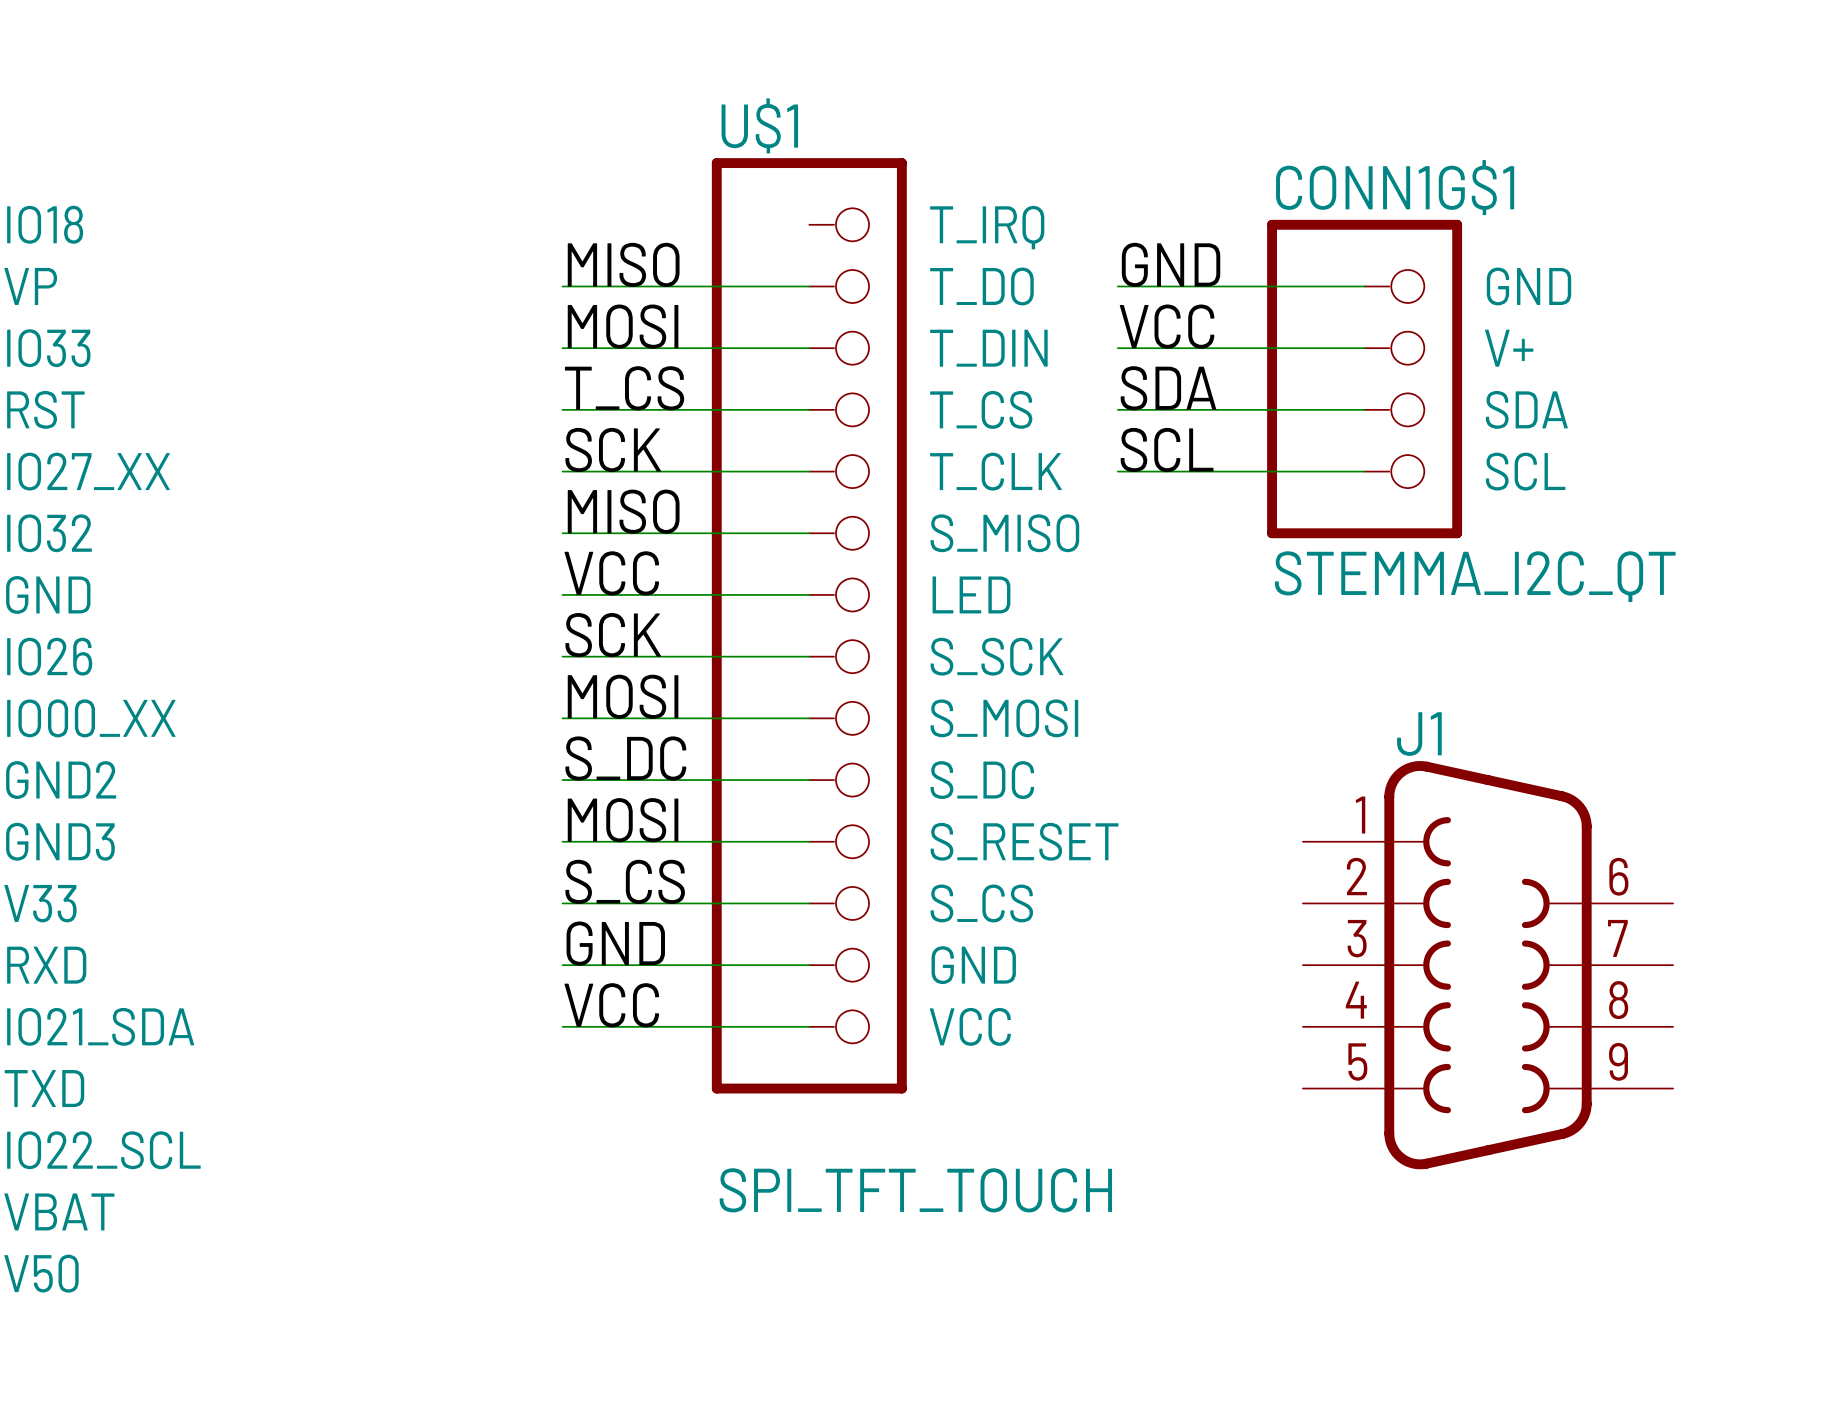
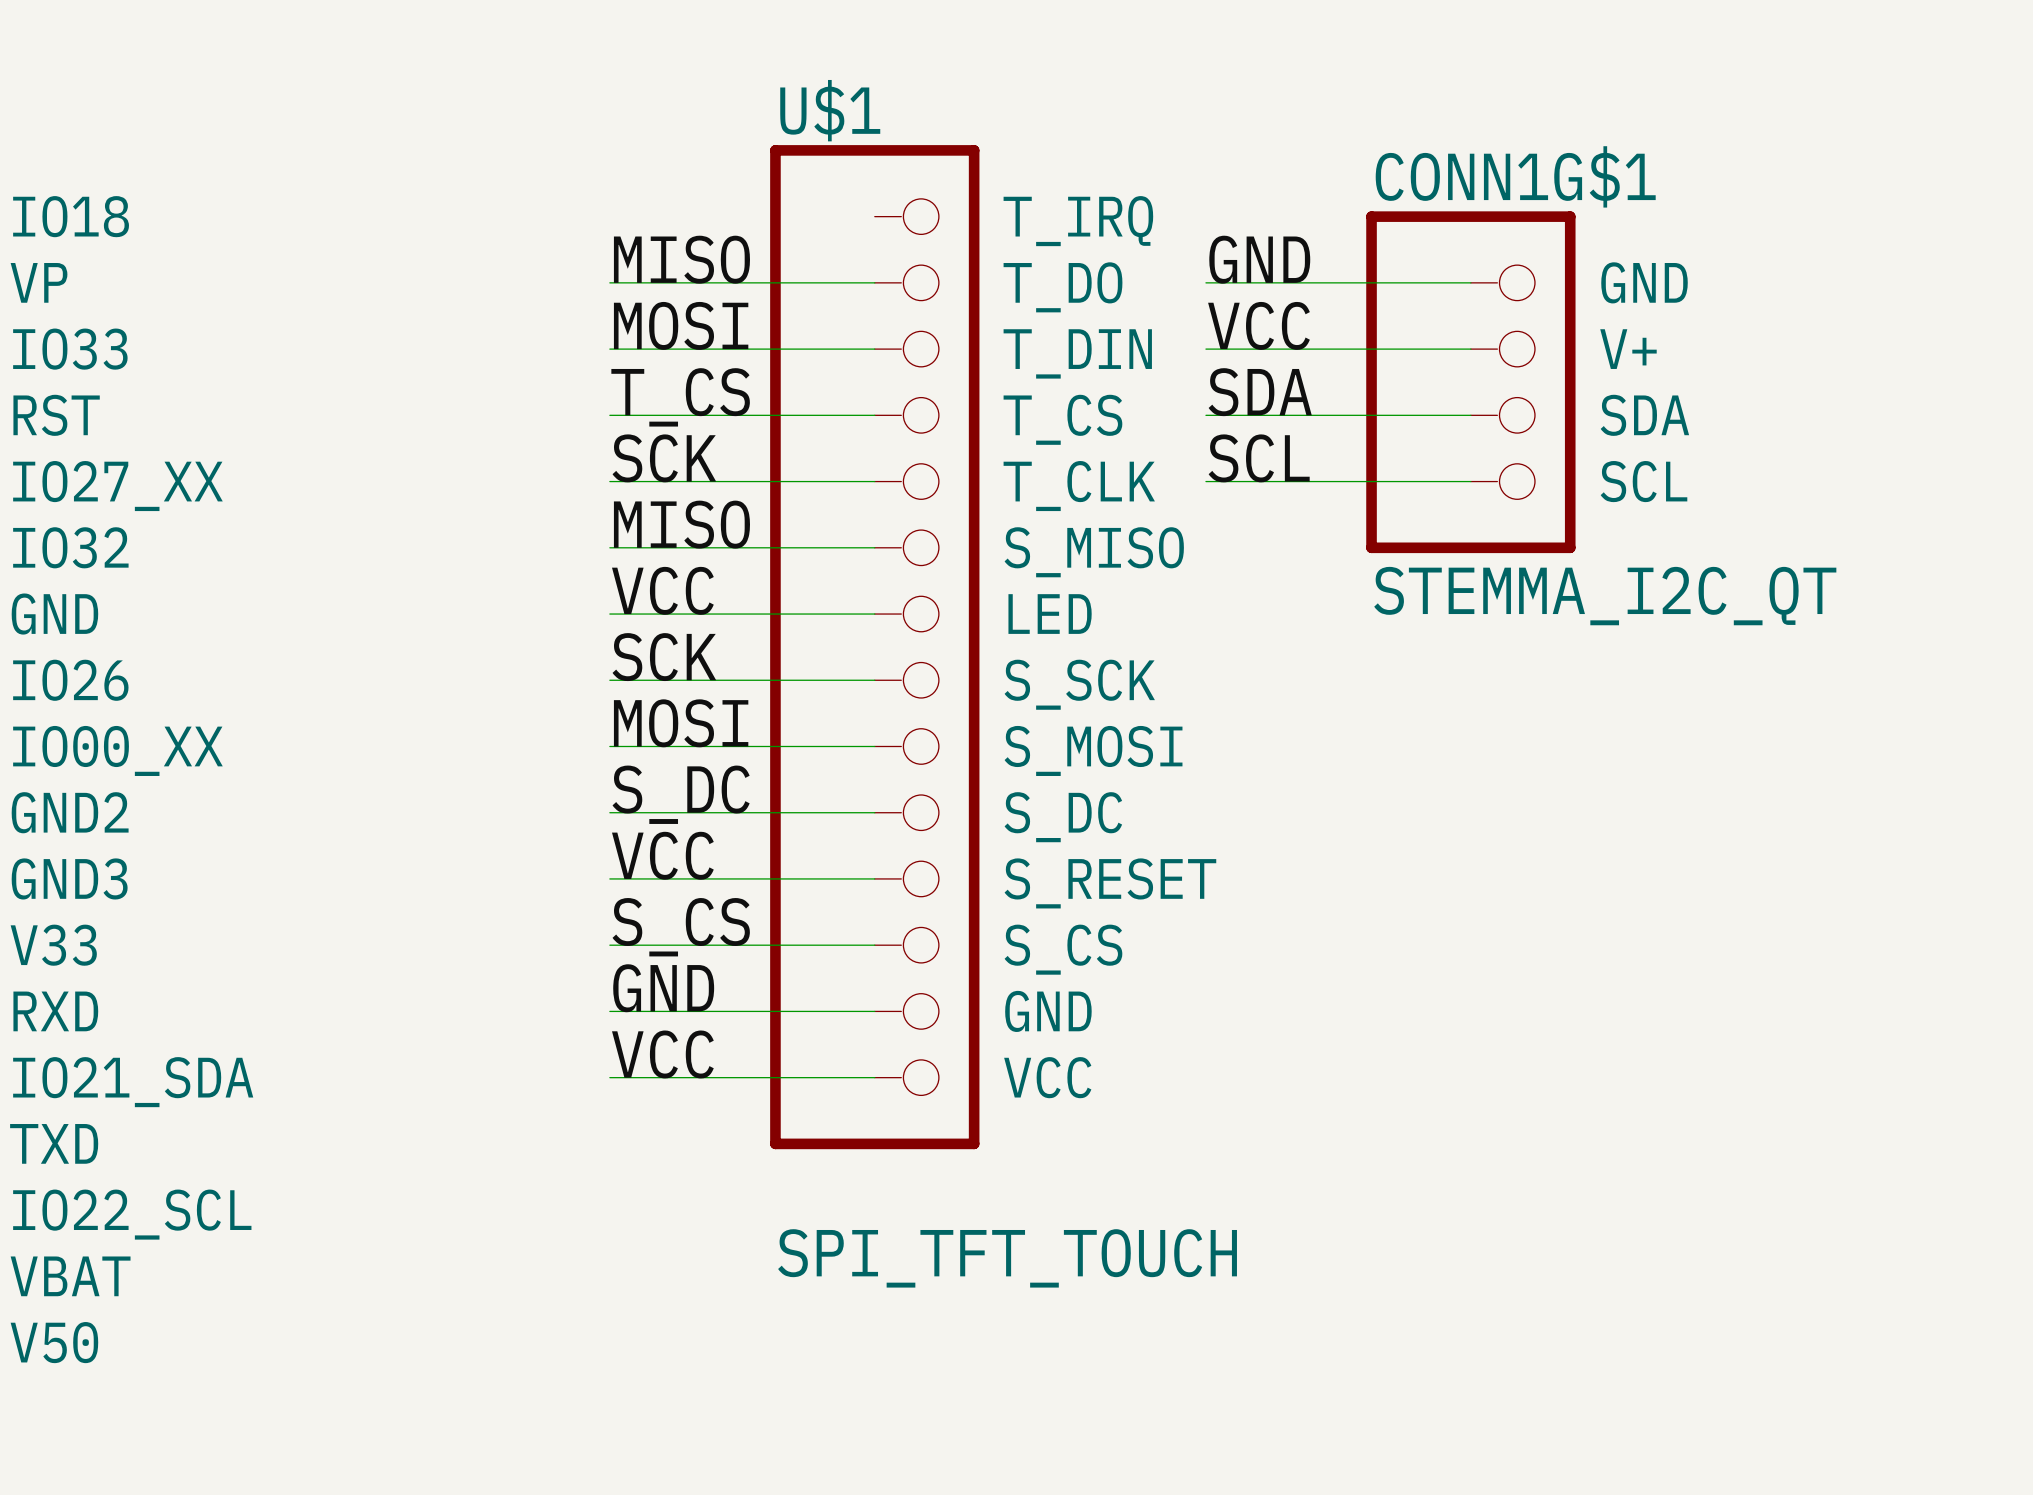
label: MOSI (623, 820) -> VCC (662, 855)
J1: (1487, 965) -> none

